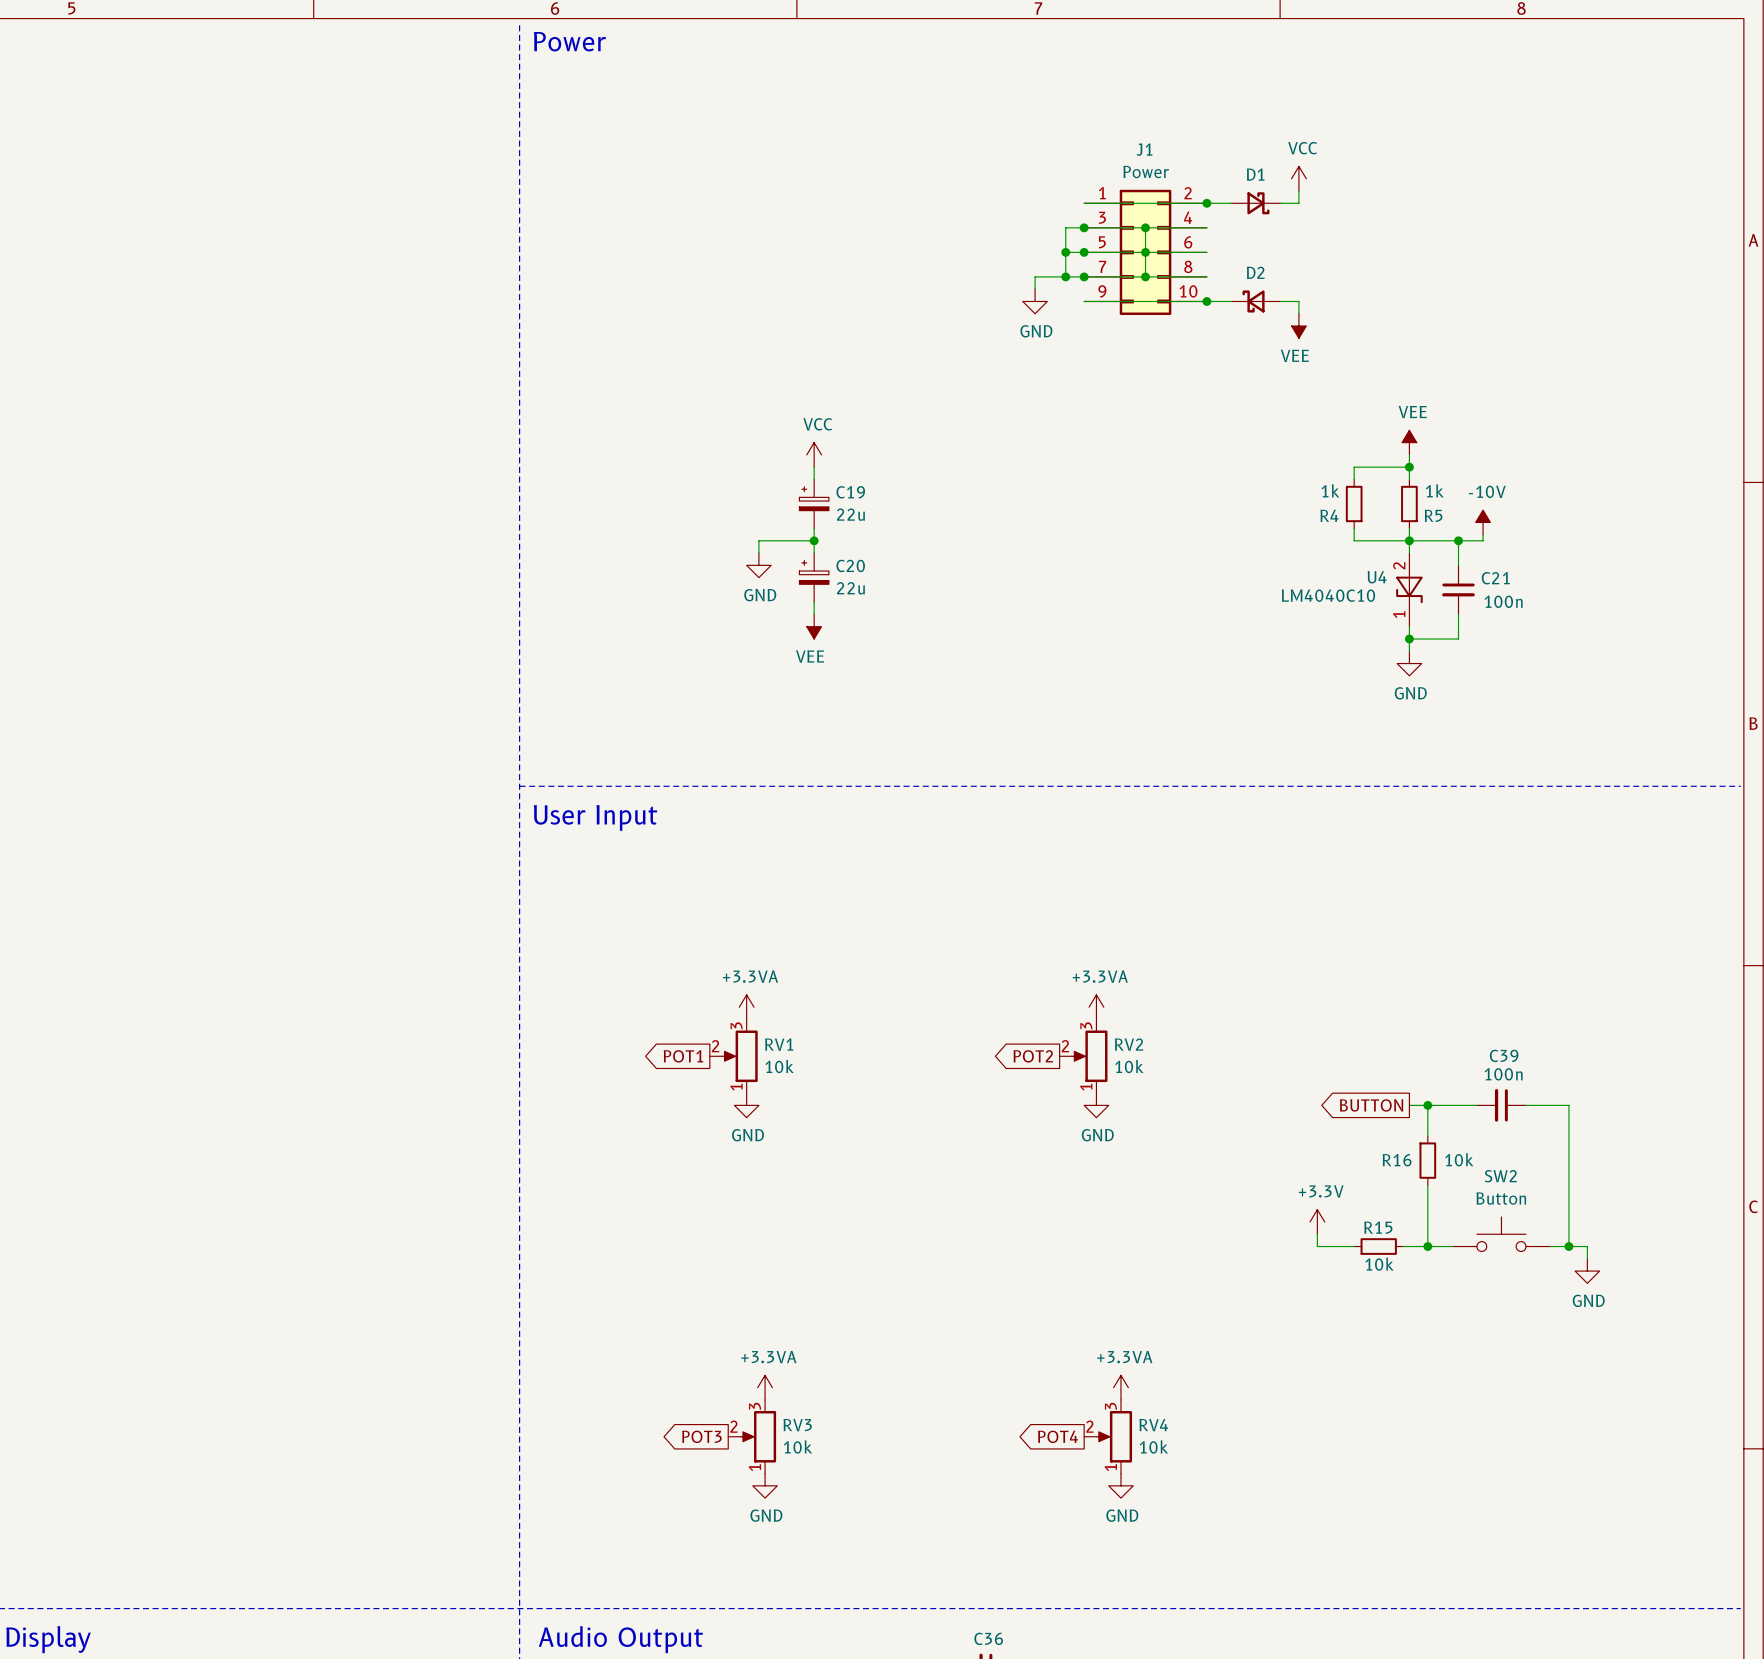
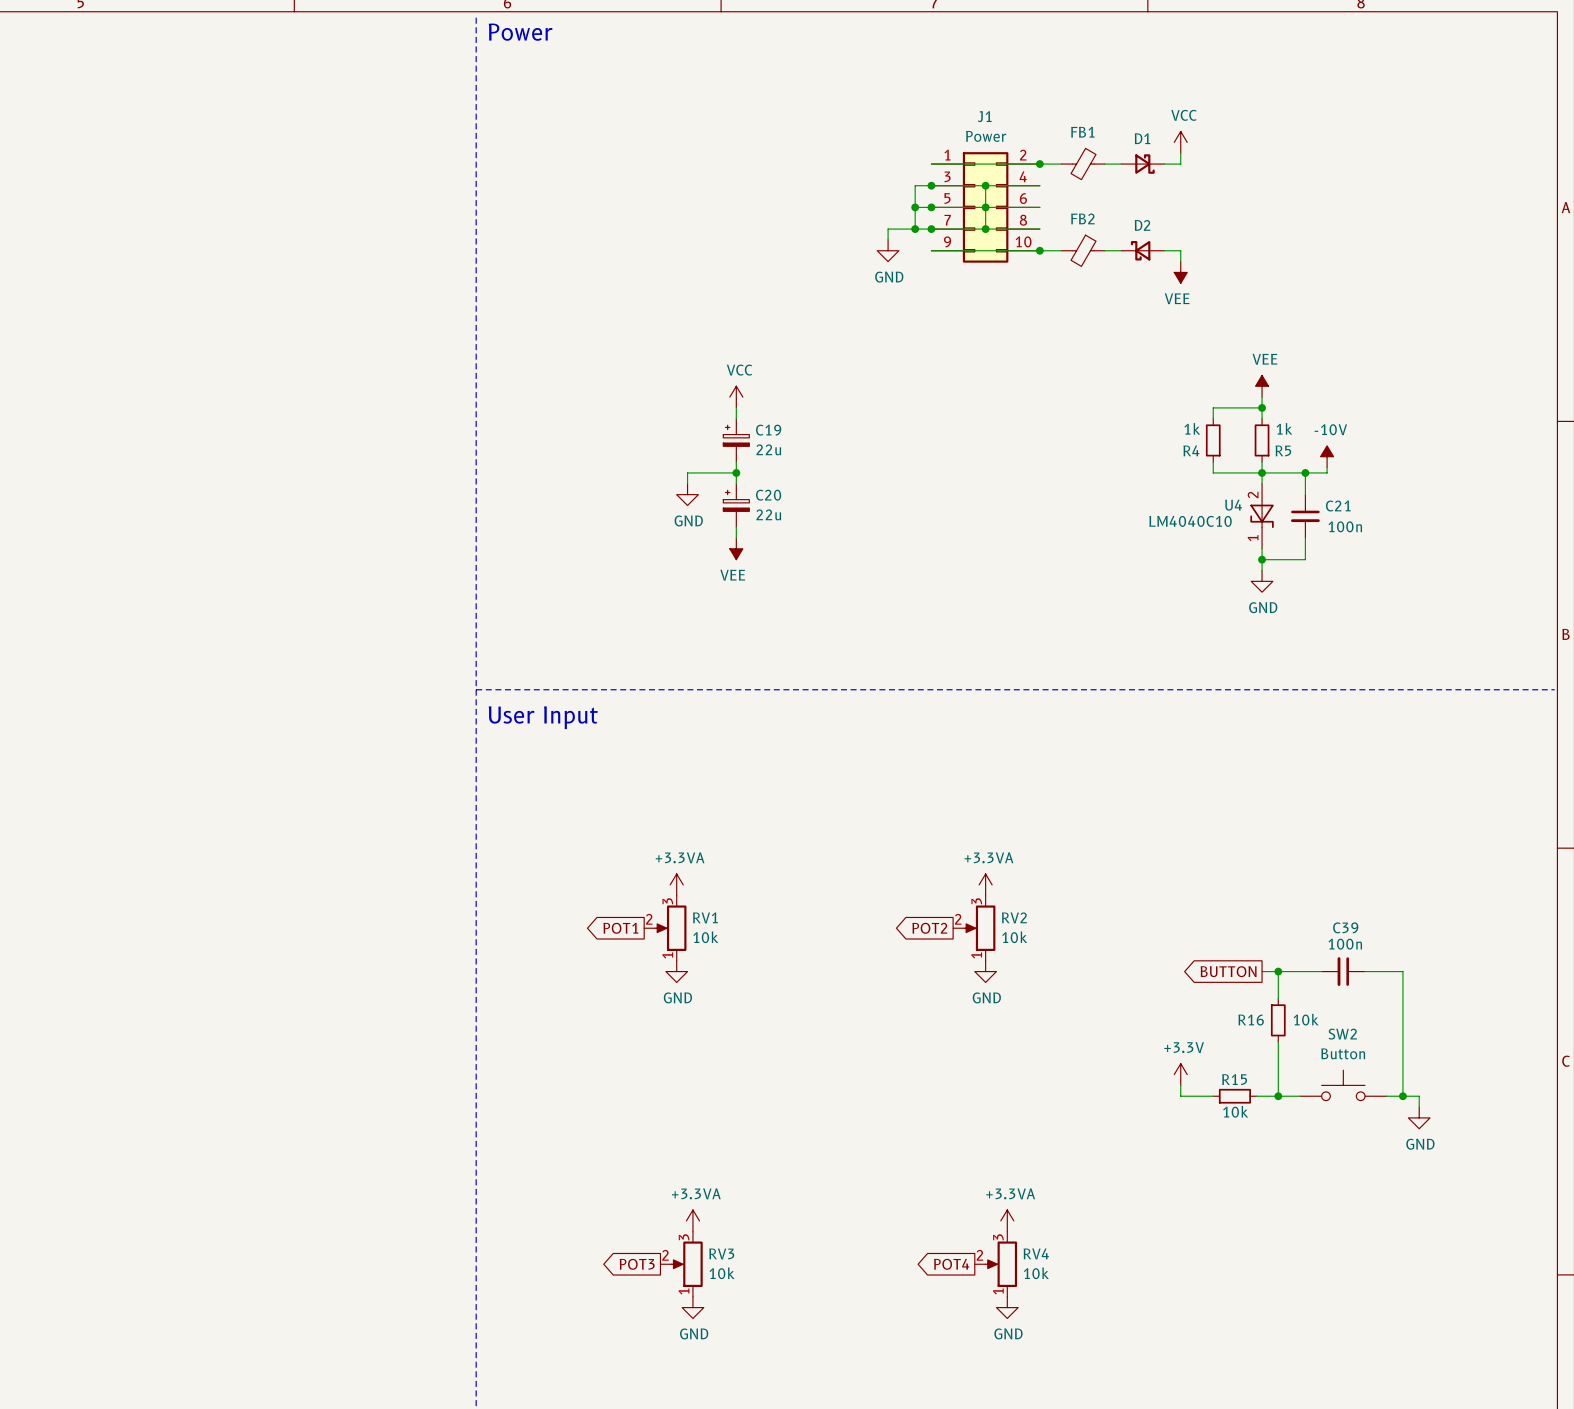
power symbol position: VCC (1298, 178) -> VCC (1180, 142)
junction: none -> (1039, 164)
FB1: none -> (1083, 164)
wire: none -> (1104, 164) (1121, 164)
wire: (1298, 191) (1298, 203) (1280, 203) -> (1164, 164) (1180, 164) (1180, 153)
wire: (1084, 203) (1231, 203) -> (931, 164) (1061, 164)
junction: (1206, 203) -> none
D1 position: (1255, 203) -> (1142, 164)
junction: none -> (931, 185)
junction: none -> (985, 185)
junction: (1084, 227) -> none
wire: (1145, 227) (1145, 276) -> (985, 185) (985, 229)
junction: (1145, 227) -> none
wire: (1206, 227) (1065, 227) (1065, 276) -> (1039, 185) (915, 185) (915, 229)
junction: none -> (915, 207)
junction: none -> (931, 207)
junction: none -> (985, 207)
wire: (1065, 252) (1206, 252) -> (915, 207) (1039, 207)
junction: (1065, 252) -> none
junction: (1084, 252) -> none
J1 position: (1145, 252) -> (985, 207)
junction: (1145, 252) -> none
junction: none -> (915, 229)
junction: none -> (931, 229)
junction: none -> (985, 229)
wire: none -> (1039, 229) (888, 229) (888, 239)
junction: (1065, 276) -> none
junction: (1084, 276) -> none
junction position: (1145, 276) -> (1039, 250)
wire: (1206, 276) (1035, 276) (1035, 289) -> (1061, 250) (931, 250)
FB2: none -> (1083, 250)
wire: none -> (1104, 250) (1121, 250)
power symbol position: GND (1035, 301) -> GND (888, 250)
wire: (1084, 301) (1231, 301) -> none
junction: (1206, 301) -> none
D2 position: (1255, 301) -> (1142, 250)
wire: (1280, 301) (1298, 301) (1298, 313) -> (1164, 250) (1180, 250) (1180, 261)
power symbol position: VEE (1298, 326) -> VEE (1180, 272)

